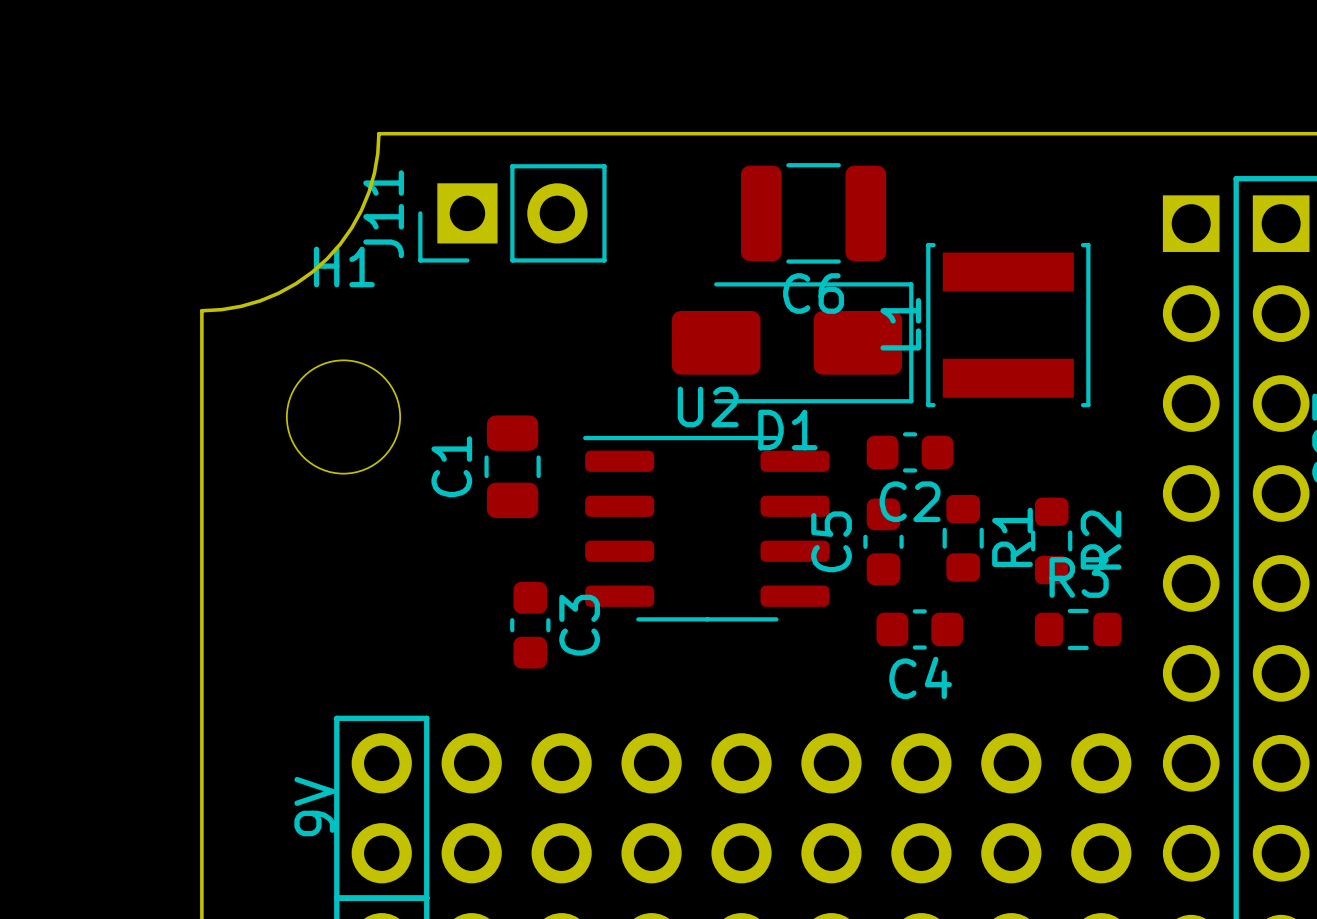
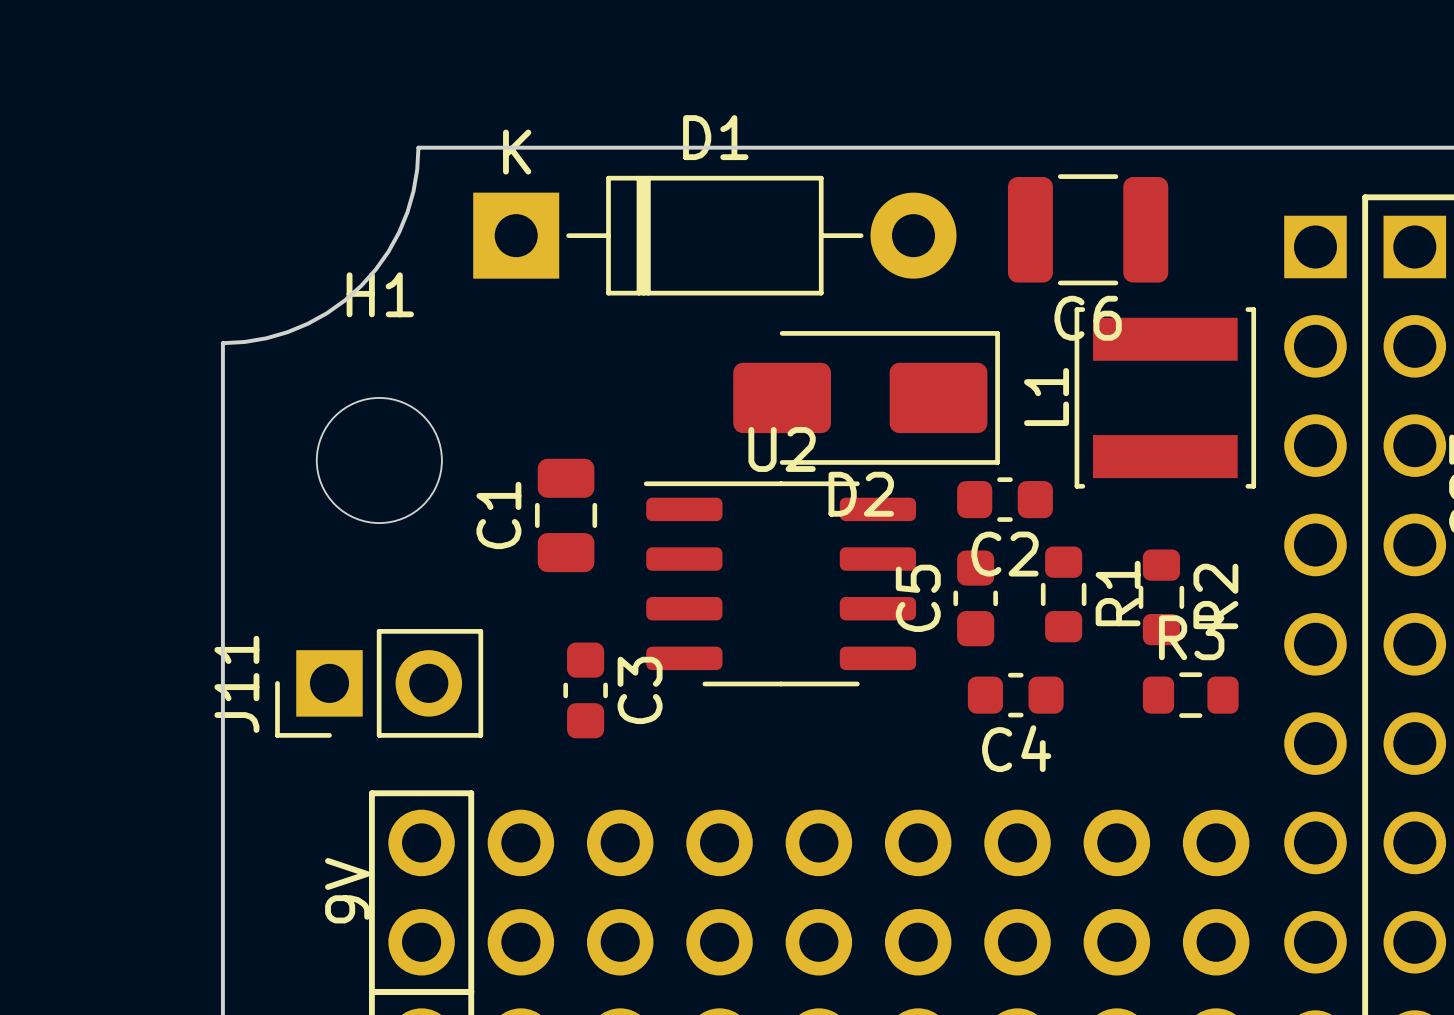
J11 position: (512, 213) -> (379, 683)
C6 position: (813, 213) -> (1088, 229)
D1 footprint: [671, 282, 914, 404] -> [473, 175, 957, 296]
L1 position: (1008, 325) -> (1165, 397)
D2: none -> (866, 397)
D1 name position: D1 (787, 430) -> D1 (715, 137)

